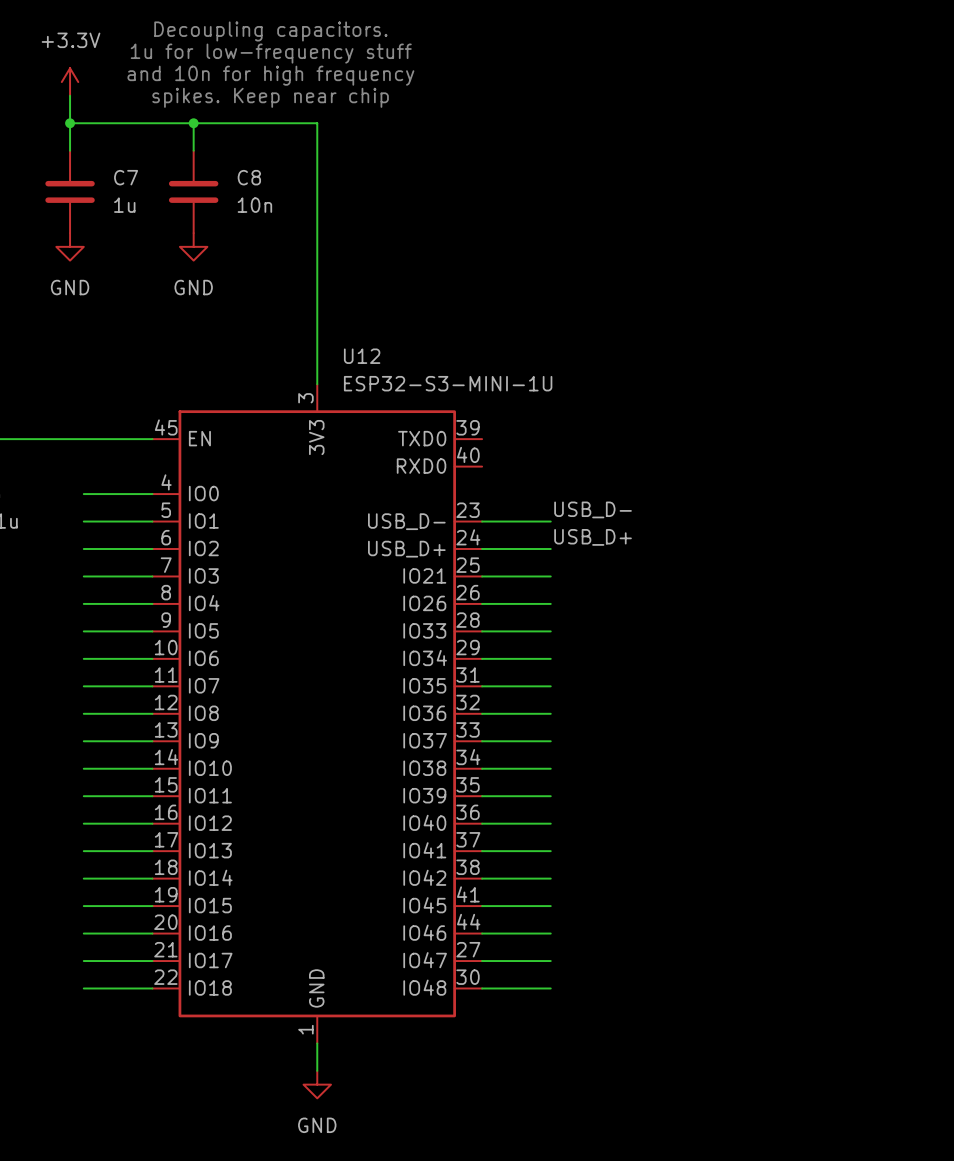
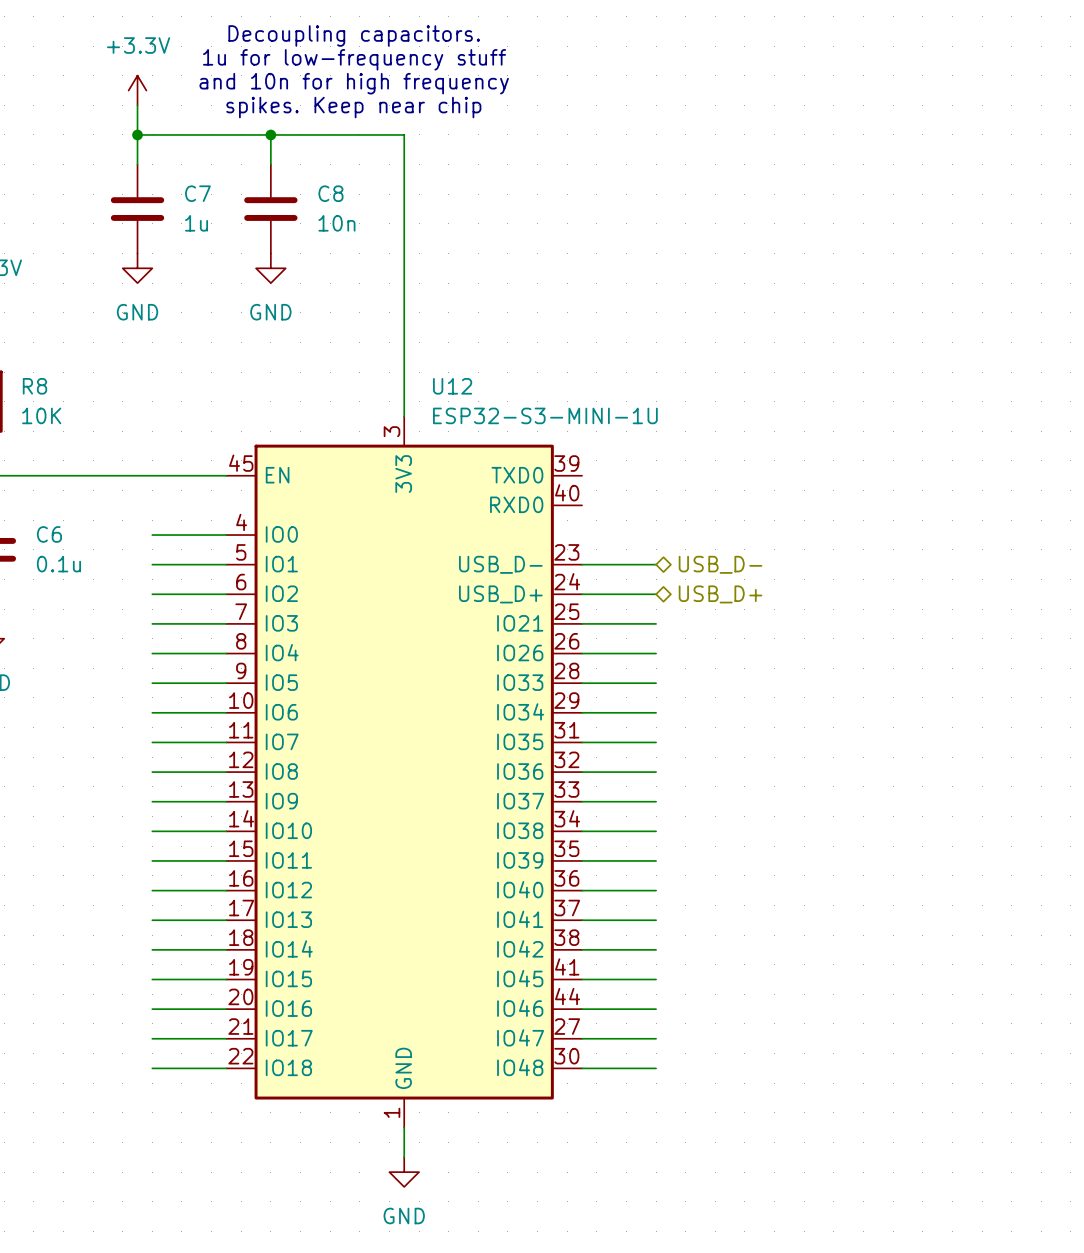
label: USB_D- (593, 509) -> none
hierarchical label: none -> USB_D- (720, 564)
label: USB_D+ (593, 537) -> none
hierarchical label: none -> USB_D+ (720, 594)

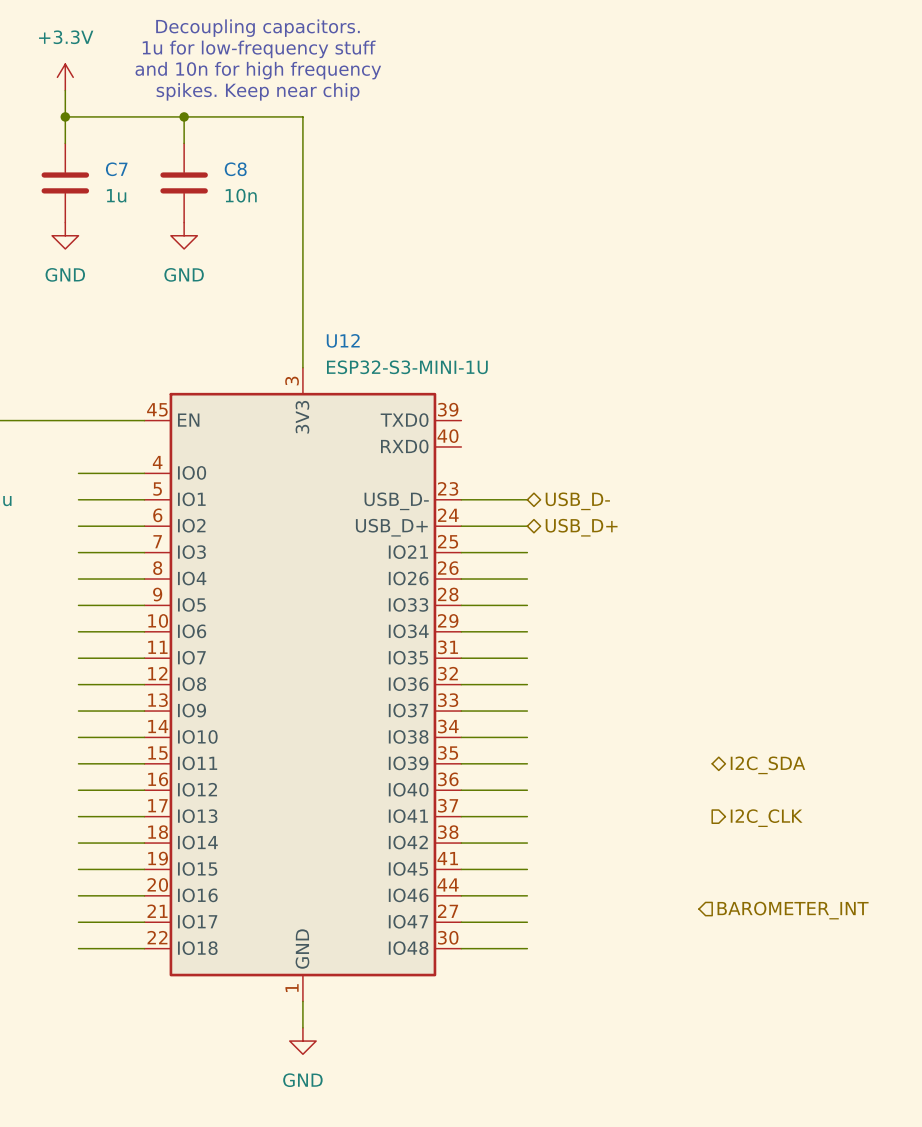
hierarchical label: none -> I2C_SDA (767, 765)
hierarchical label: none -> I2C_CLK (766, 818)
hierarchical label: none -> BAROMETER_INT (793, 910)

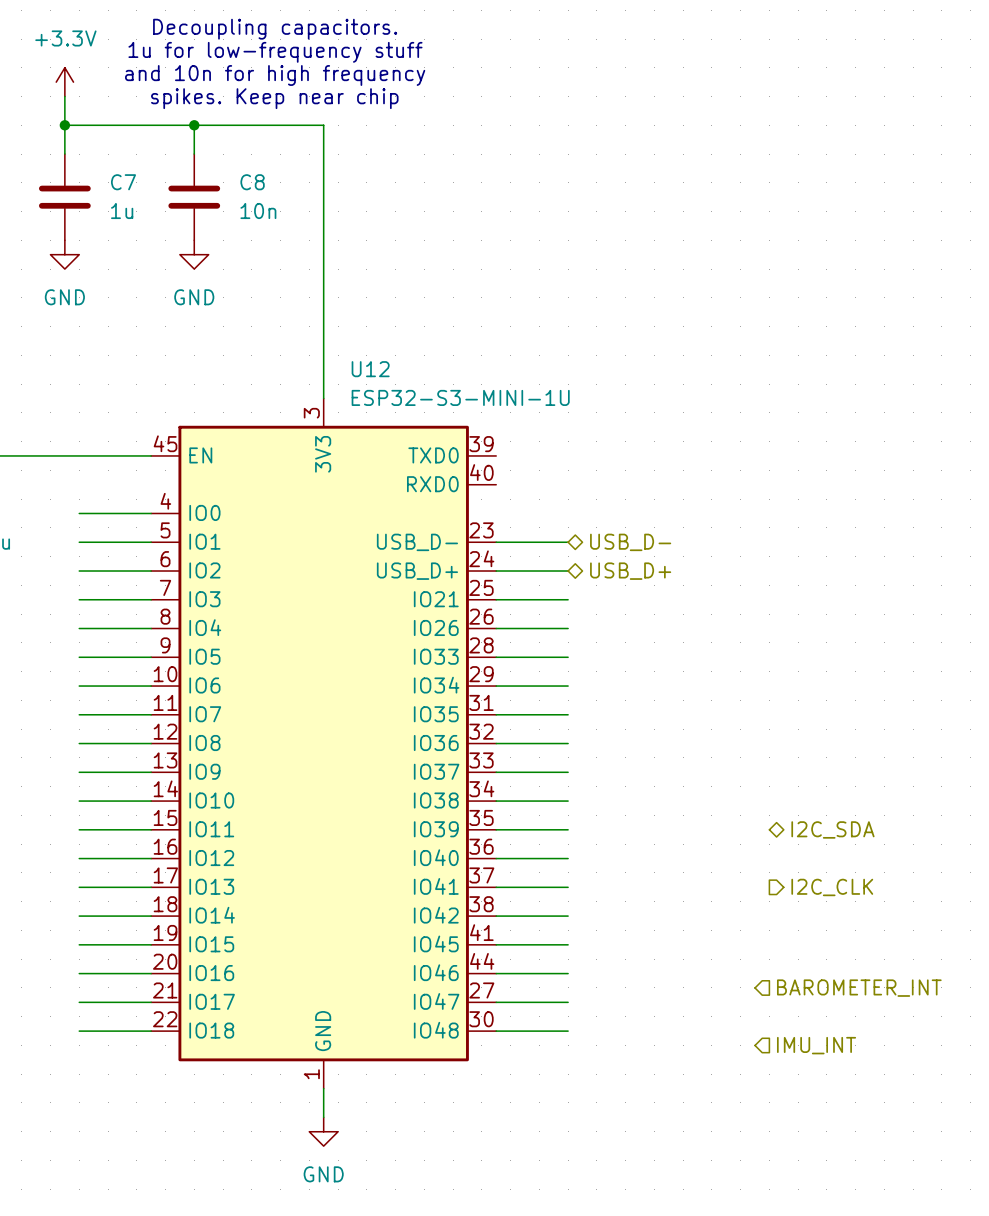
hierarchical label: none -> IMU_INT (816, 1045)

